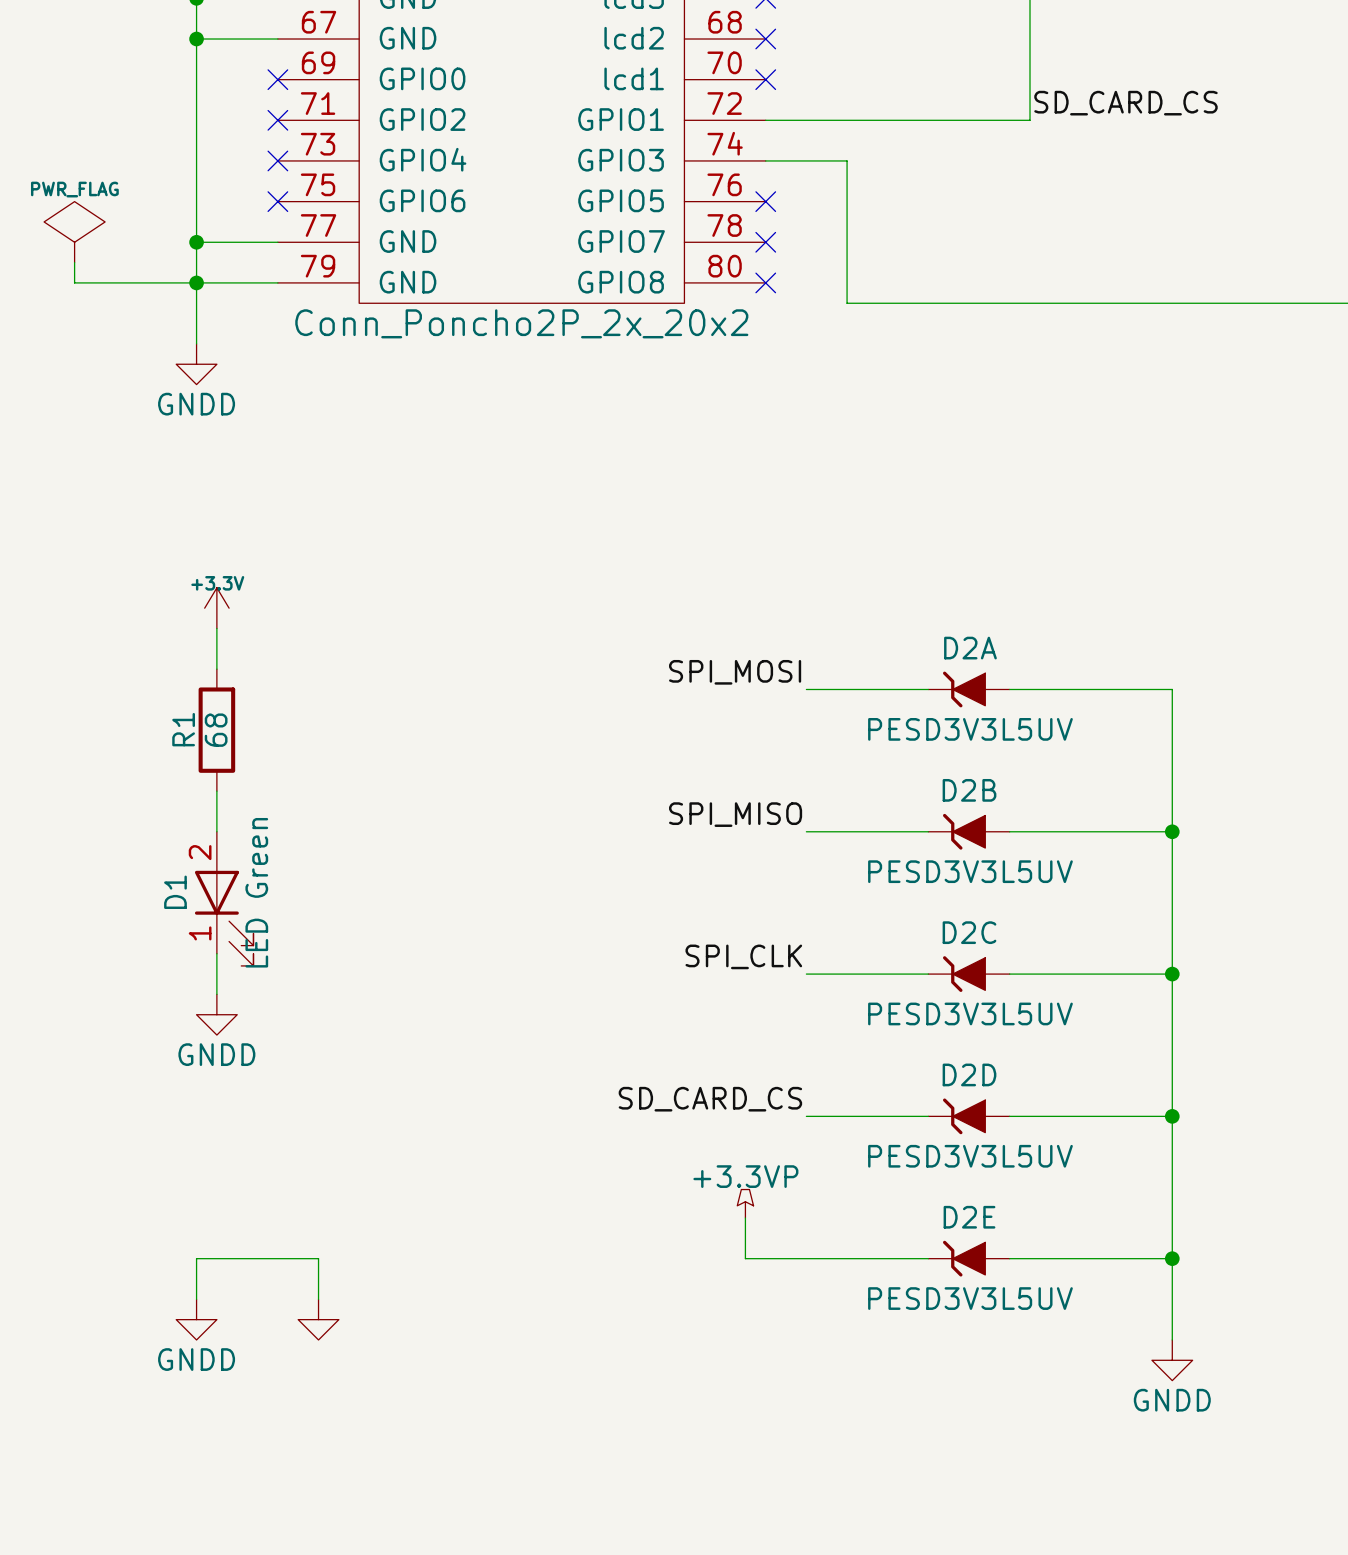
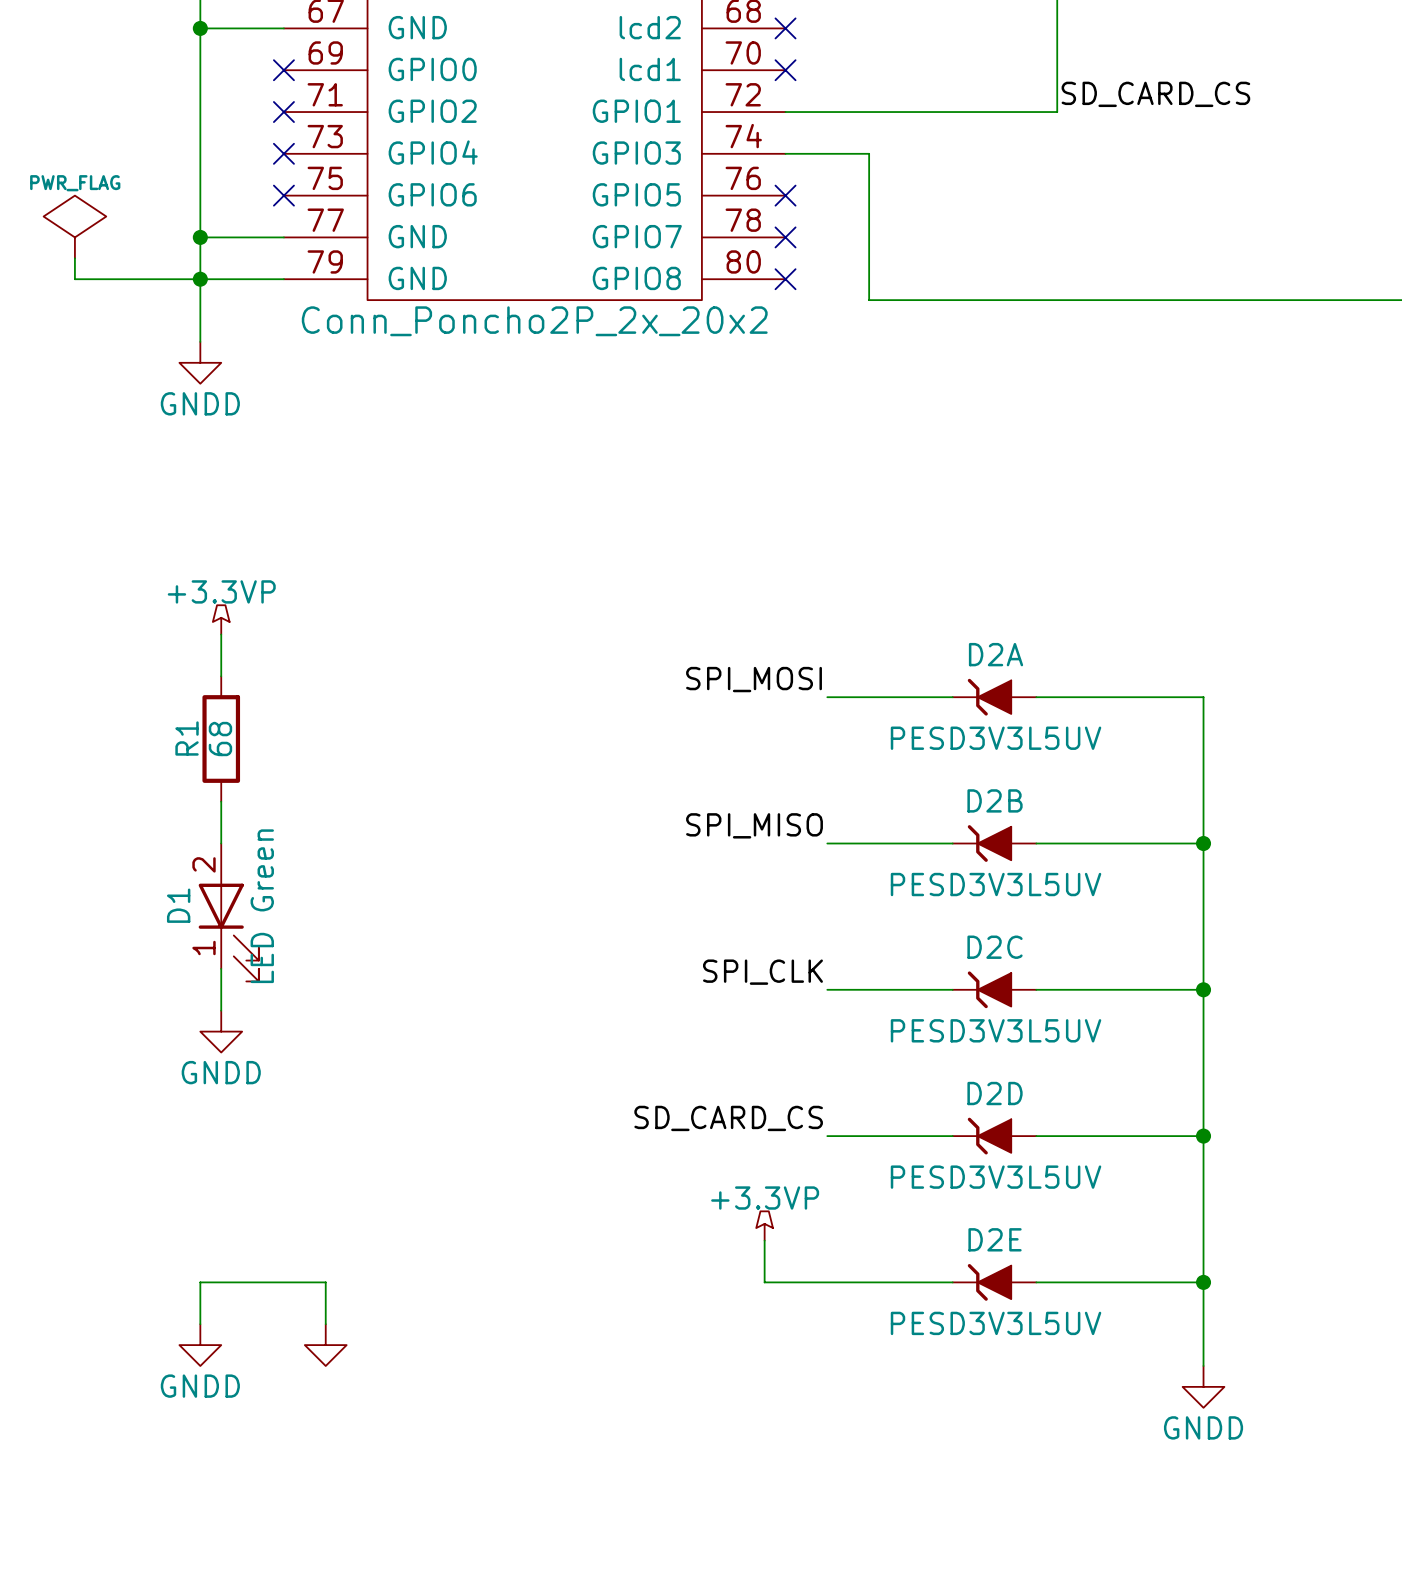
power symbol: +3.3V (216, 608) -> +3.3VP (221, 619)

